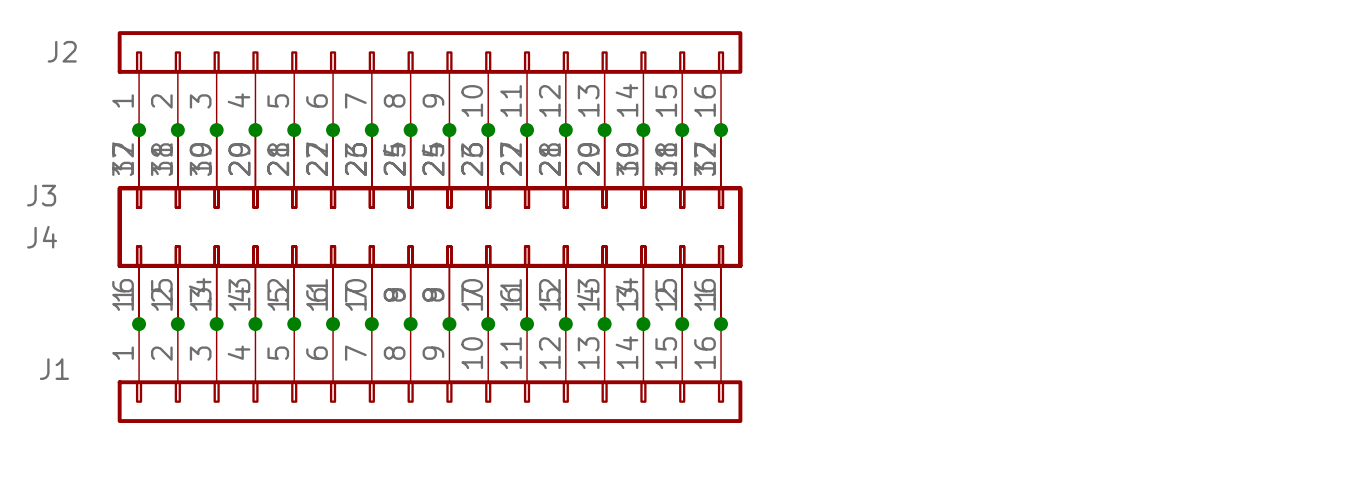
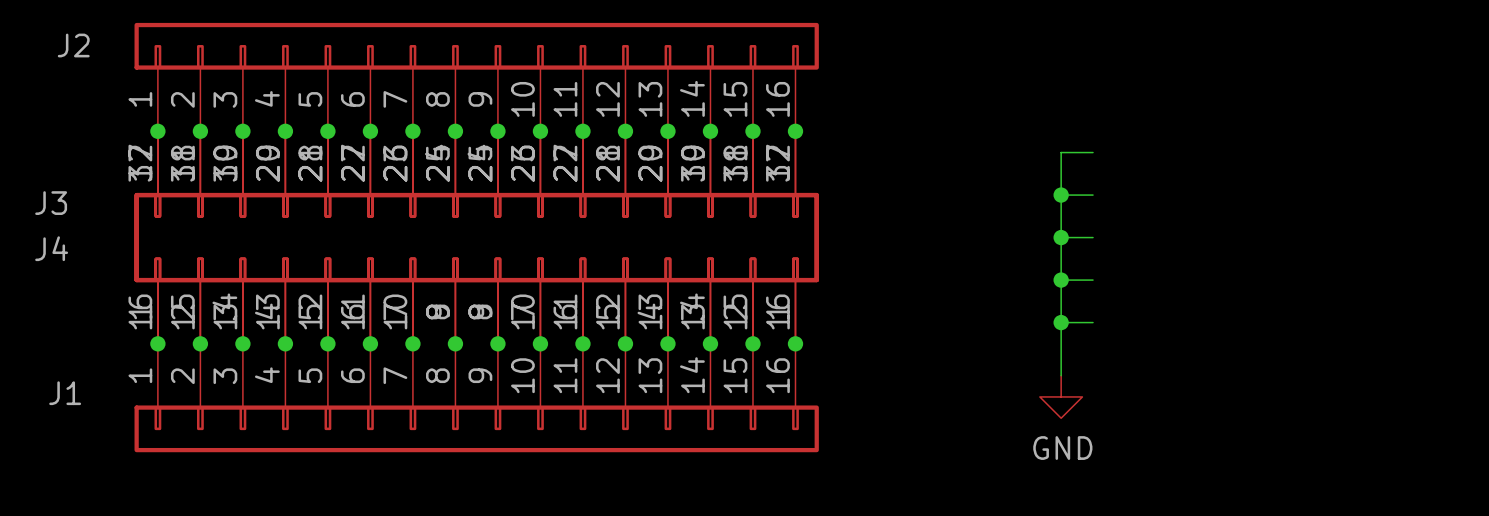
wire: none -> (1093, 152) (1061, 152) (1061, 375)
wire: none -> (1061, 195) (1093, 195)
junction: none -> (1061, 195)
wire: none -> (1061, 237) (1093, 237)
junction: none -> (1061, 237)
wire: none -> (1061, 280) (1093, 280)
junction: none -> (1061, 280)
wire: none -> (1061, 322) (1093, 322)
junction: none -> (1061, 322)
power symbol: none -> GND (1061, 396)

